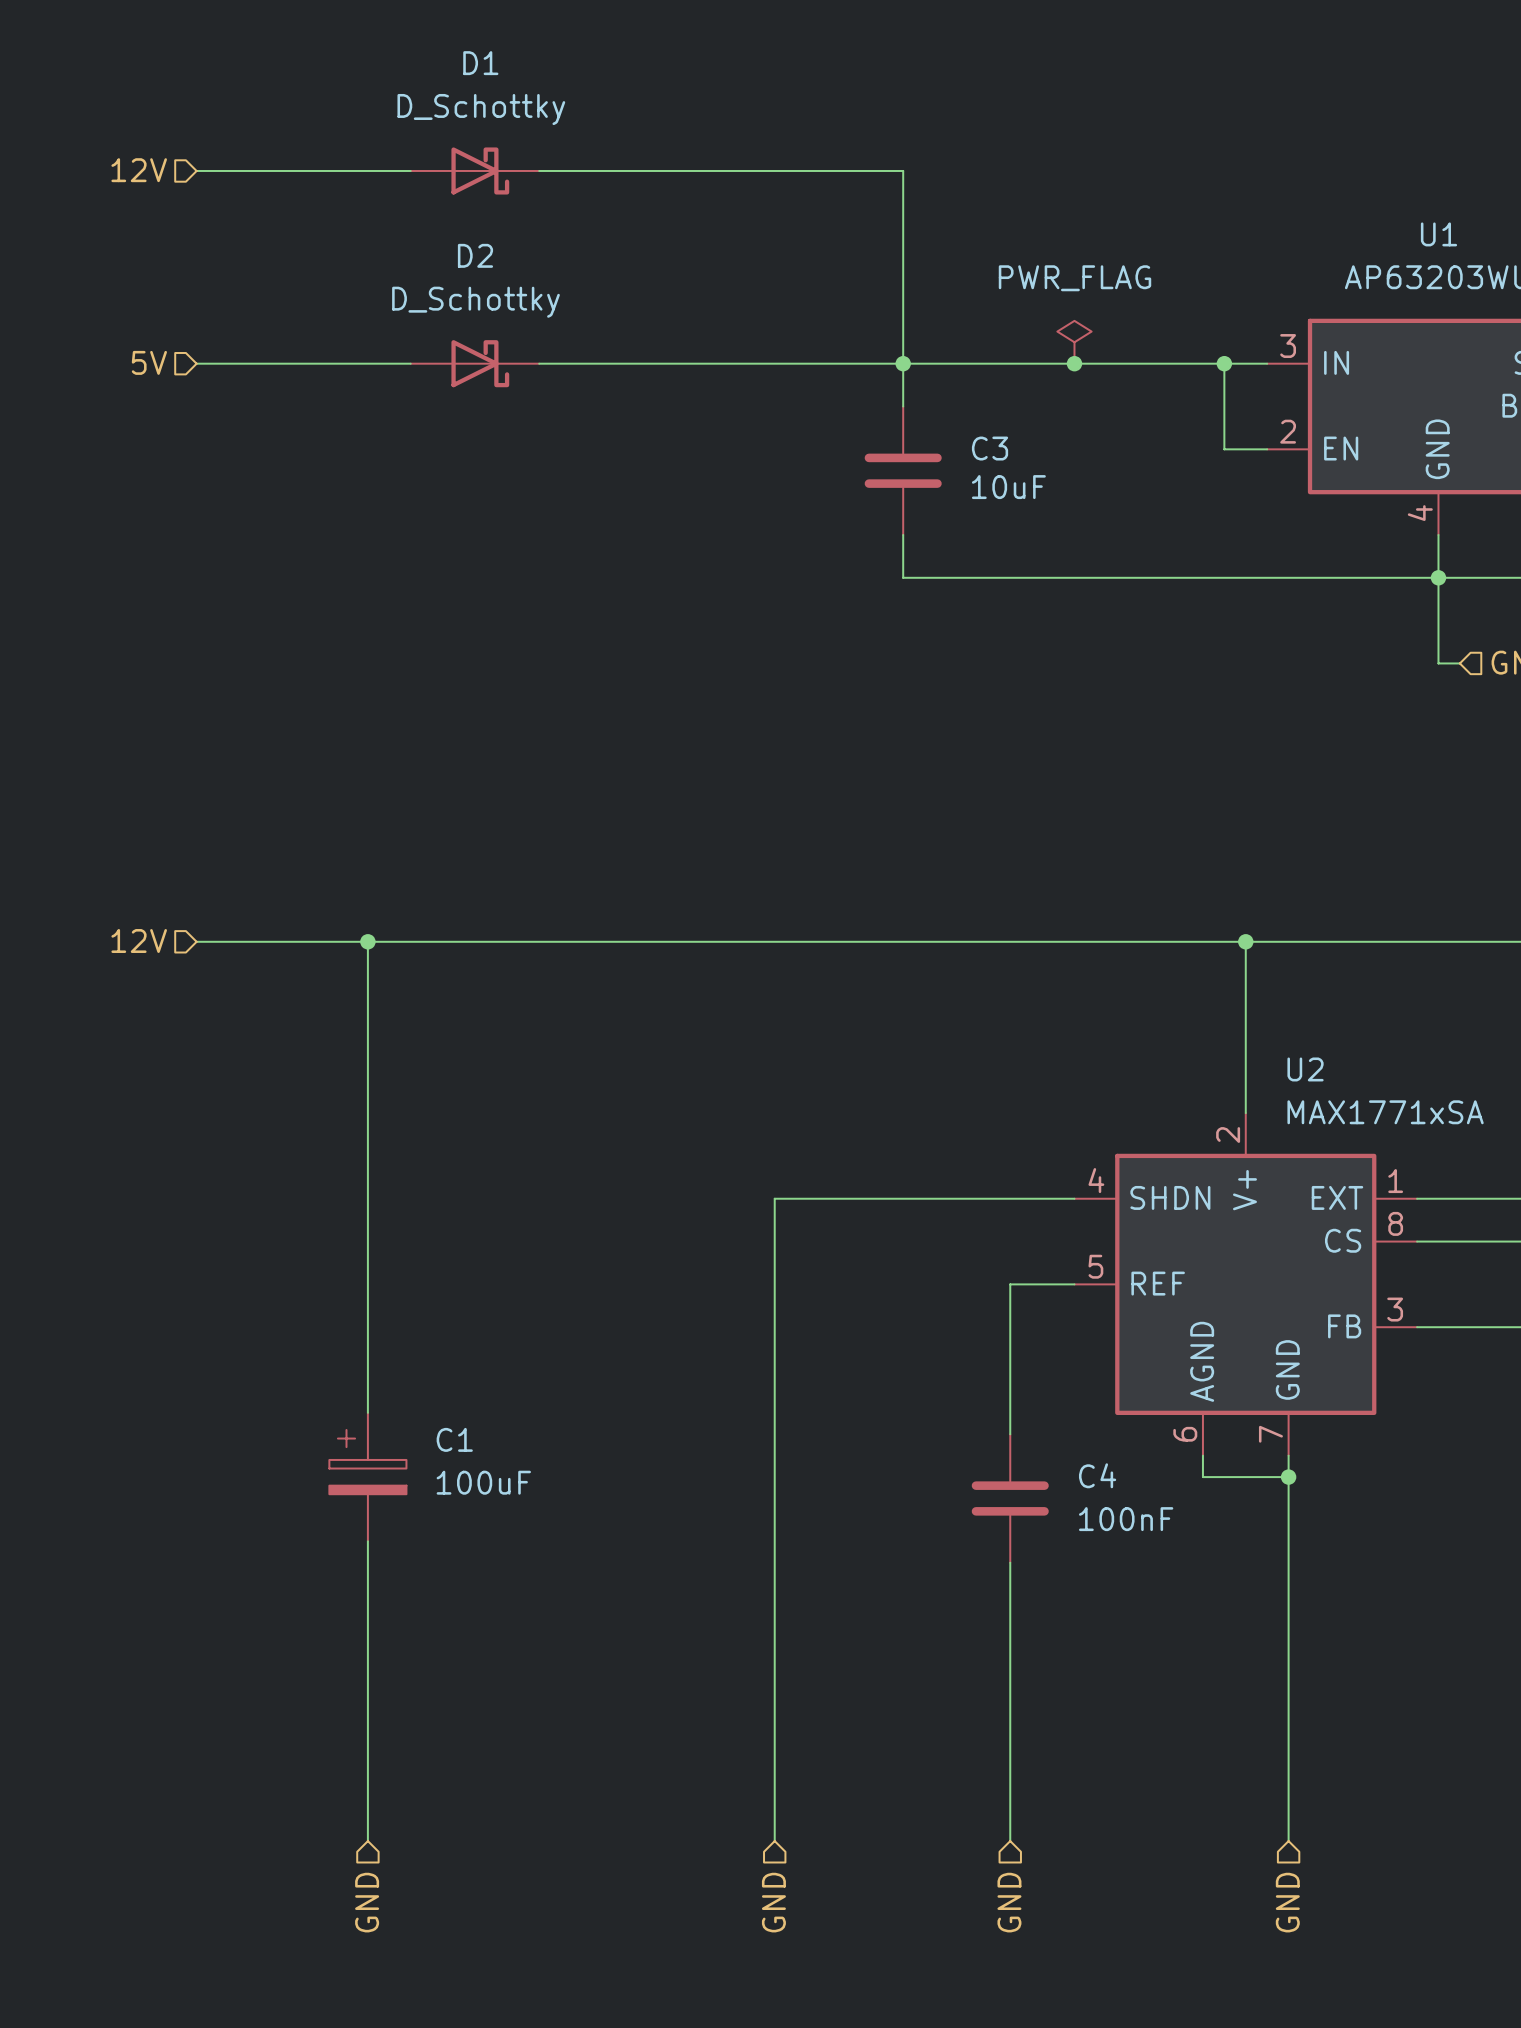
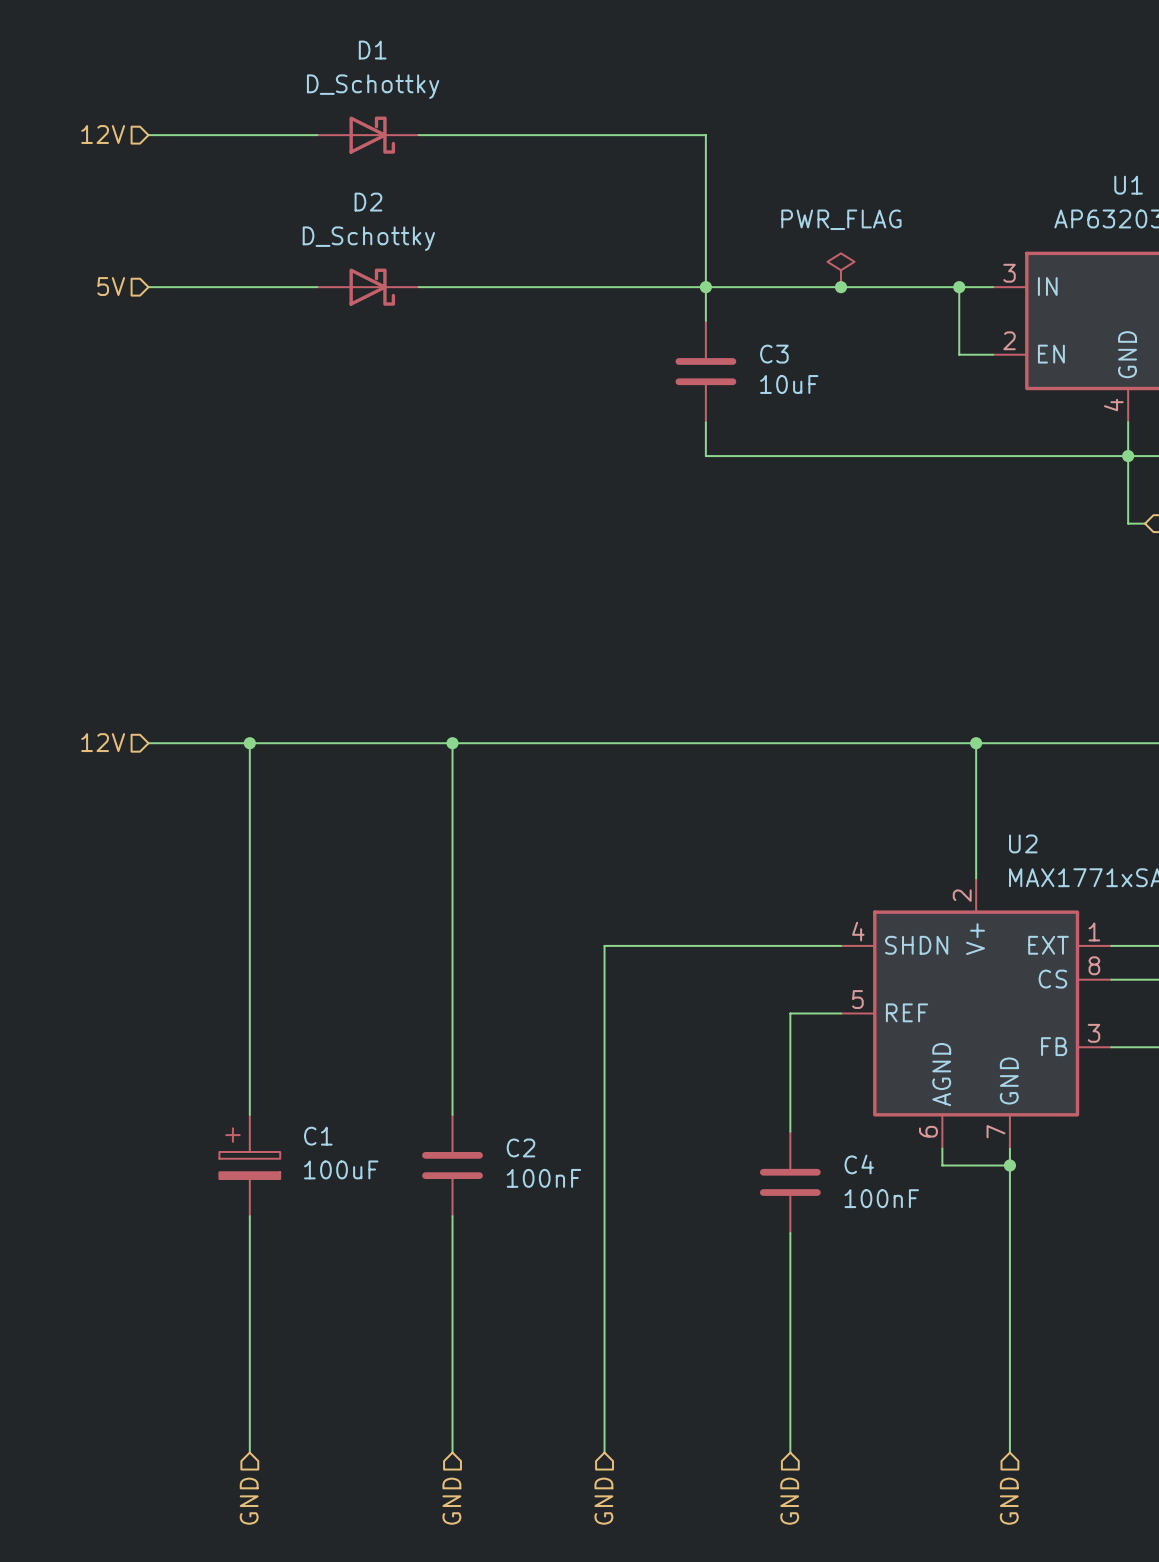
wire: (367, 941) (367, 1412) -> (249, 743) (249, 1114)
junction position: (367, 941) -> (249, 743)
wire: none -> (452, 743) (452, 1114)
junction: none -> (452, 743)
C1 position: (367, 1477) -> (249, 1165)
C2: none -> 100nF (452, 1165)
wire: (367, 1541) (367, 1841) -> (249, 1216) (249, 1452)
wire: none -> (452, 1216) (452, 1452)
hierarchical label position: GND (367, 1902) -> GND (249, 1501)
hierarchical label: none -> GND (451, 1501)

